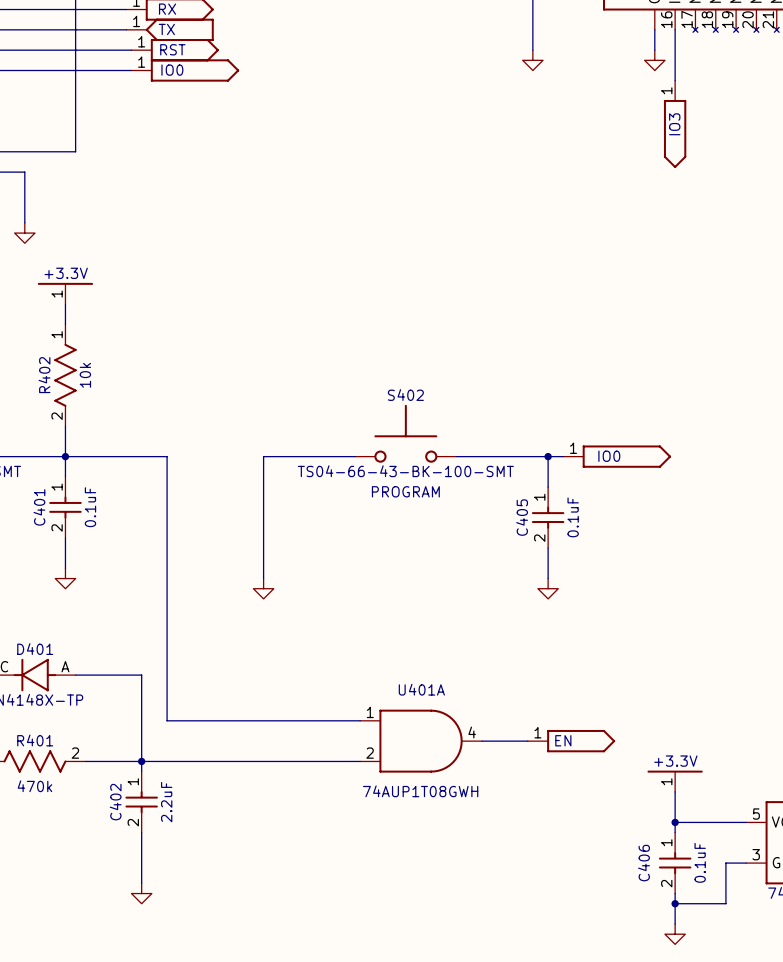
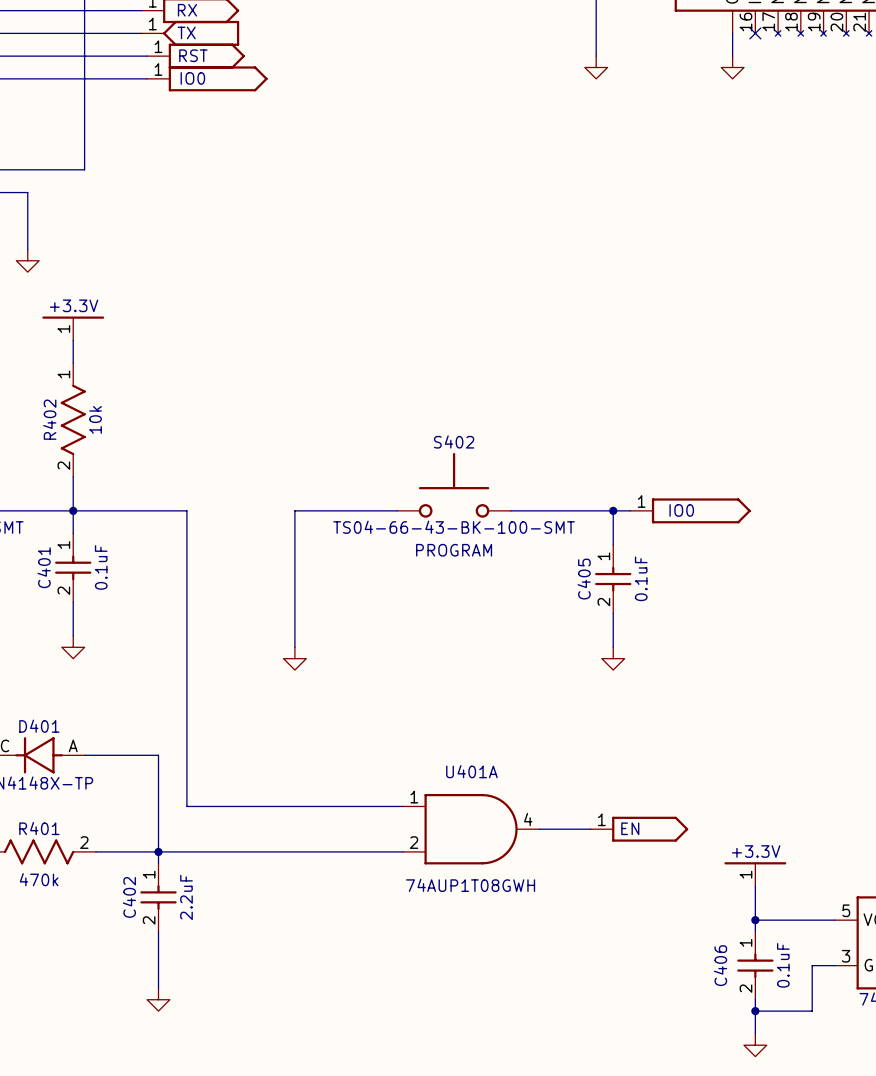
wire: (675, 29) (675, 80) -> none
no-connect mark: none -> (755, 33)
power symbol: IO3 (675, 124) -> none

